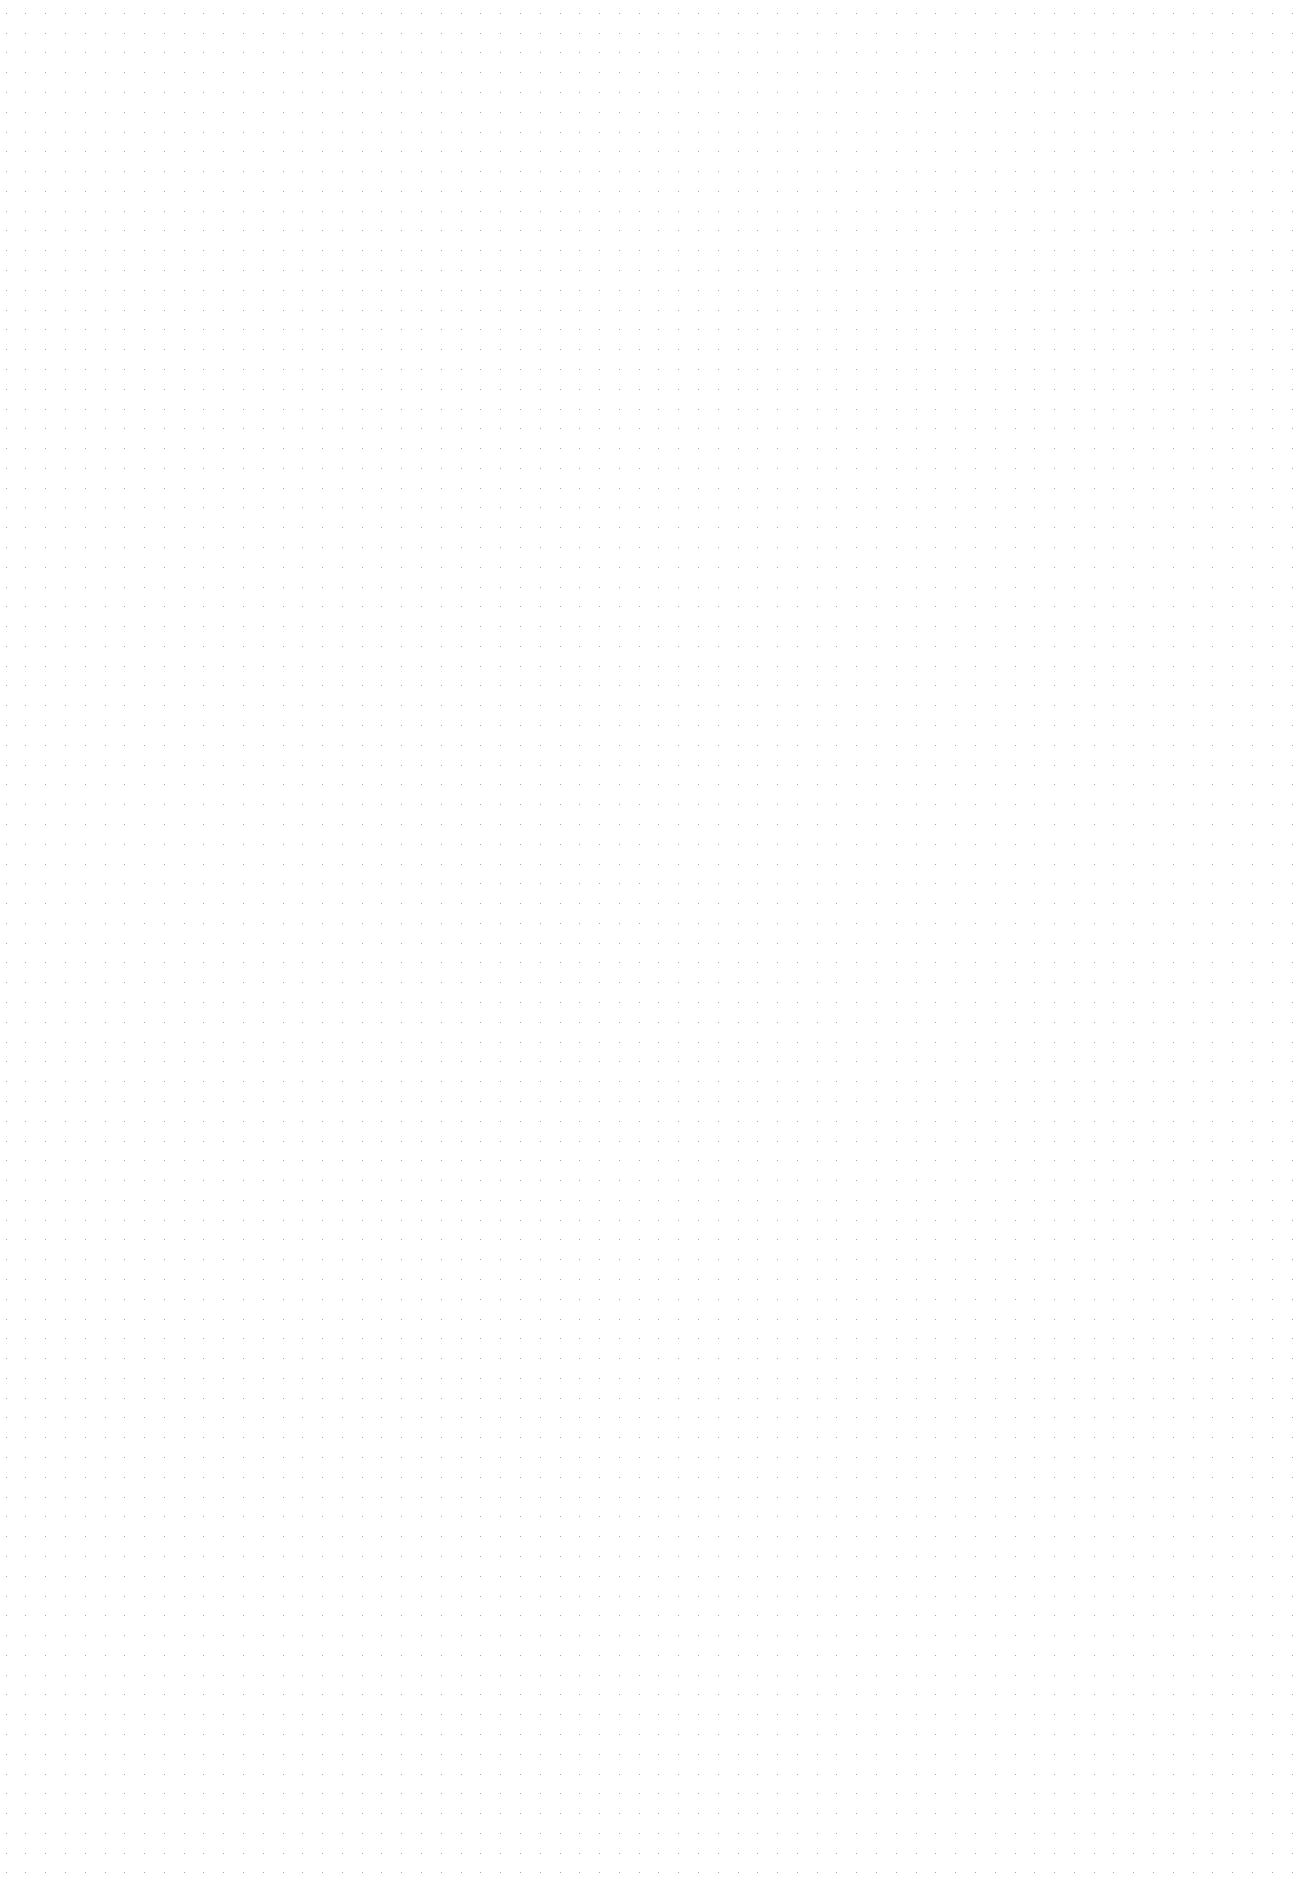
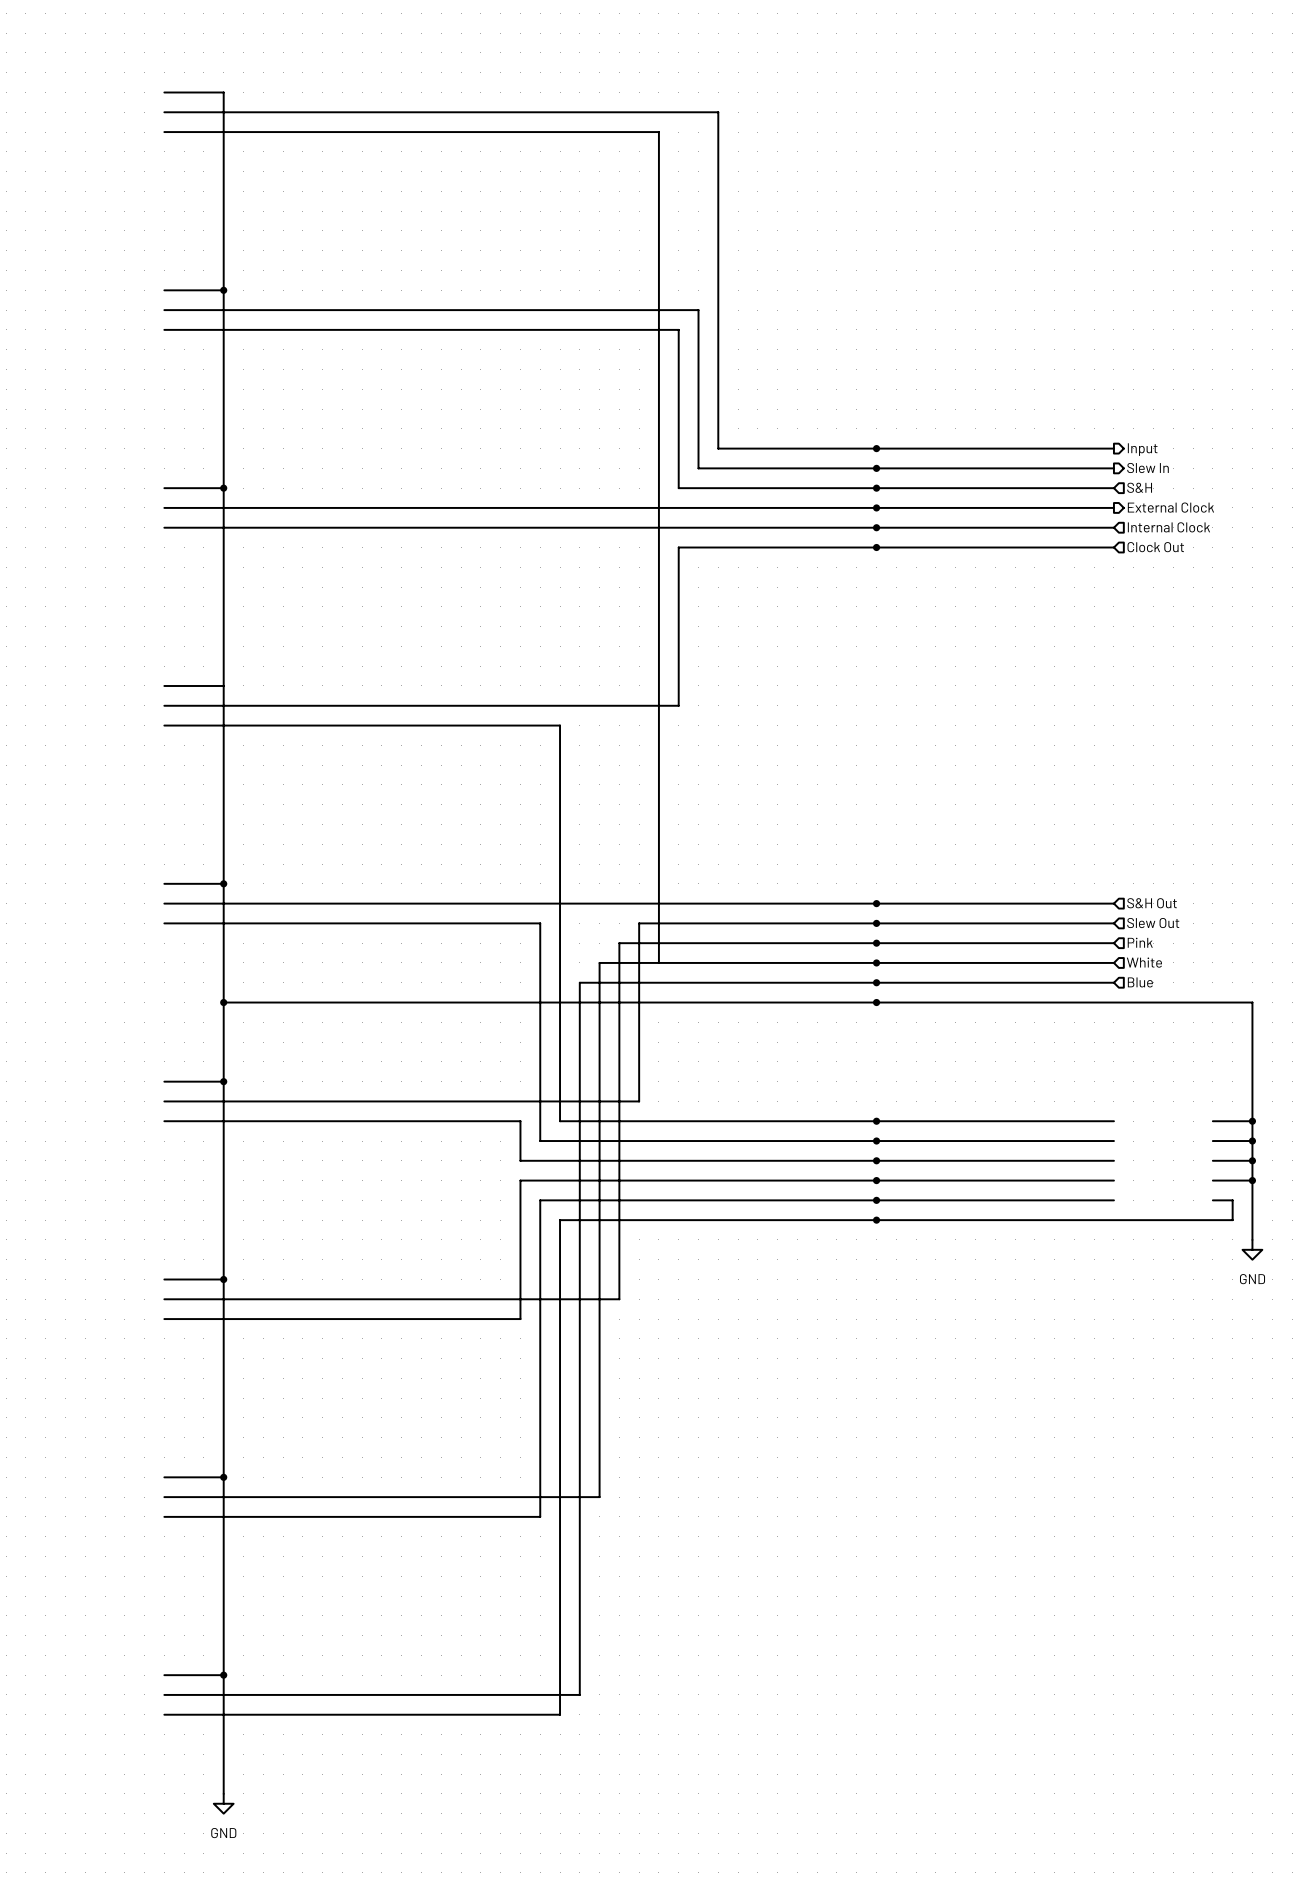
wire: none -> (164, 92) (223, 92) (223, 1793)
wire: none -> (164, 112) (718, 112) (718, 448) (1113, 448)
wire: none -> (164, 132) (658, 132) (658, 962)
wire: none -> (164, 290) (223, 290)
junction: none -> (223, 290)
wire: none -> (164, 310) (698, 310) (698, 468) (1113, 468)
wire: none -> (164, 329) (678, 329) (678, 488) (1113, 488)
junction: none -> (876, 448)
hierarchical label: none -> Input (1142, 449)
junction: none -> (876, 468)
hierarchical label: none -> Slew In (1148, 468)
hierarchical label: none -> S&H (1139, 487)
wire: none -> (164, 488) (223, 488)
junction: none -> (223, 488)
junction: none -> (876, 488)
wire: none -> (164, 507) (1113, 507)
junction: none -> (876, 507)
hierarchical label: none -> External Clock (1170, 507)
wire: none -> (164, 527) (1113, 527)
junction: none -> (876, 527)
hierarchical label: none -> Internal Clock (1168, 527)
junction: none -> (876, 547)
wire: none -> (1113, 547) (678, 547) (678, 705) (164, 705)
hierarchical label: none -> Clock Out (1155, 547)
wire: none -> (164, 685) (223, 685)
wire: none -> (164, 725) (560, 725) (560, 1121) (1113, 1121)
wire: none -> (164, 883) (223, 883)
junction: none -> (223, 883)
wire: none -> (164, 903) (1113, 903)
junction: none -> (876, 903)
hierarchical label: none -> S&H Out (1152, 903)
wire: none -> (164, 923) (540, 923) (540, 1141) (1113, 1141)
junction: none -> (876, 923)
wire: none -> (1113, 923) (639, 923) (639, 1101) (164, 1101)
hierarchical label: none -> Slew Out (1153, 923)
hierarchical label: none -> Pink (1140, 942)
junction: none -> (876, 943)
wire: none -> (1113, 943) (619, 943) (619, 1299) (164, 1299)
junction: none -> (876, 962)
wire: none -> (1113, 962) (599, 962) (599, 1497) (164, 1497)
hierarchical label: none -> White (1144, 962)
junction: none -> (876, 982)
wire: none -> (1113, 982) (579, 982) (579, 1694) (164, 1694)
hierarchical label: none -> Blue (1140, 982)
wire: none -> (223, 1002) (1252, 1002) (1252, 1239)
junction: none -> (223, 1002)
junction: none -> (876, 1002)
wire: none -> (164, 1081) (223, 1081)
junction: none -> (223, 1081)
wire: none -> (164, 1121) (520, 1121) (520, 1160) (1113, 1160)
junction: none -> (876, 1121)
wire: none -> (1212, 1121) (1252, 1121)
junction: none -> (1252, 1121)
junction: none -> (876, 1141)
wire: none -> (1212, 1141) (1252, 1141)
junction: none -> (1252, 1141)
junction: none -> (876, 1160)
wire: none -> (1212, 1160) (1252, 1160)
junction: none -> (1252, 1160)
junction: none -> (876, 1180)
wire: none -> (1113, 1180) (520, 1180) (520, 1319) (164, 1319)
wire: none -> (1212, 1180) (1252, 1180)
junction: none -> (1252, 1180)
junction: none -> (876, 1200)
wire: none -> (1113, 1200) (540, 1200) (540, 1516) (164, 1516)
wire: none -> (1212, 1200) (1232, 1200) (1232, 1220) (560, 1220) (560, 1714) (164, 1714)
junction: none -> (876, 1220)
power symbol: none -> GND (1252, 1249)
wire: none -> (164, 1279) (223, 1279)
junction: none -> (223, 1279)
wire: none -> (164, 1477) (223, 1477)
junction: none -> (223, 1477)
wire: none -> (164, 1675) (223, 1675)
junction: none -> (223, 1675)
power symbol: none -> GND (223, 1803)

